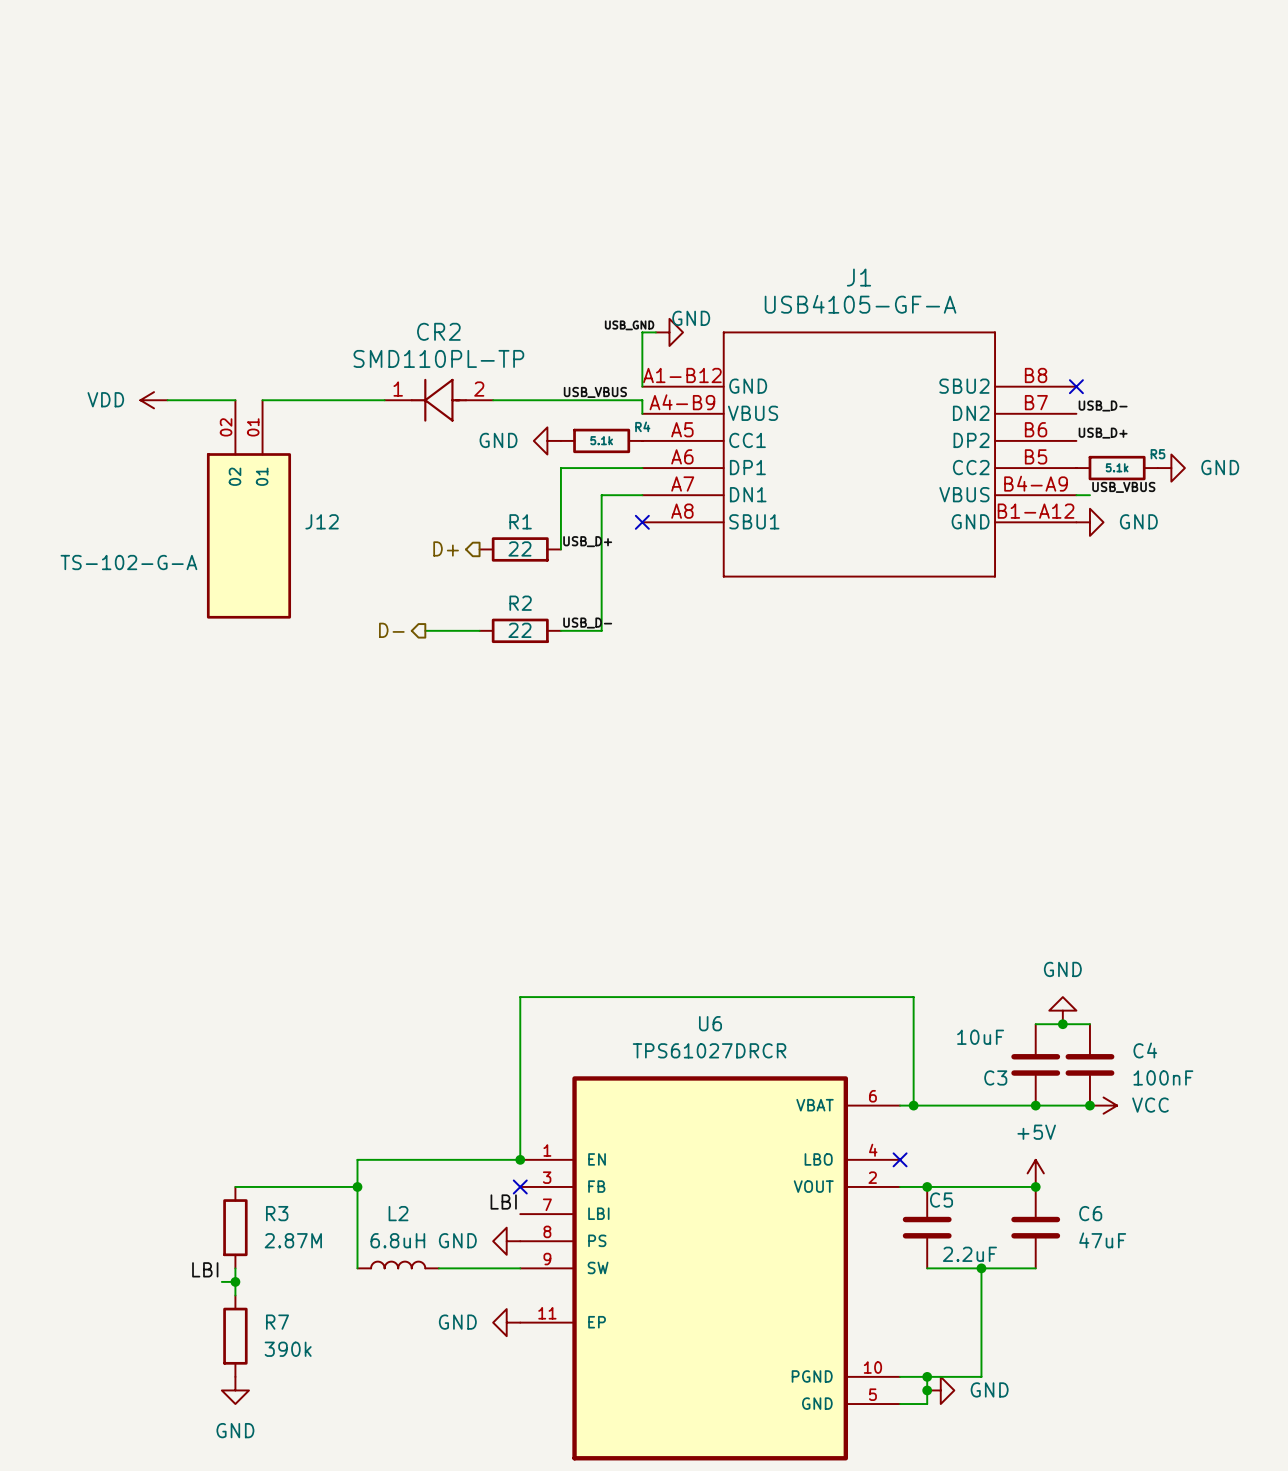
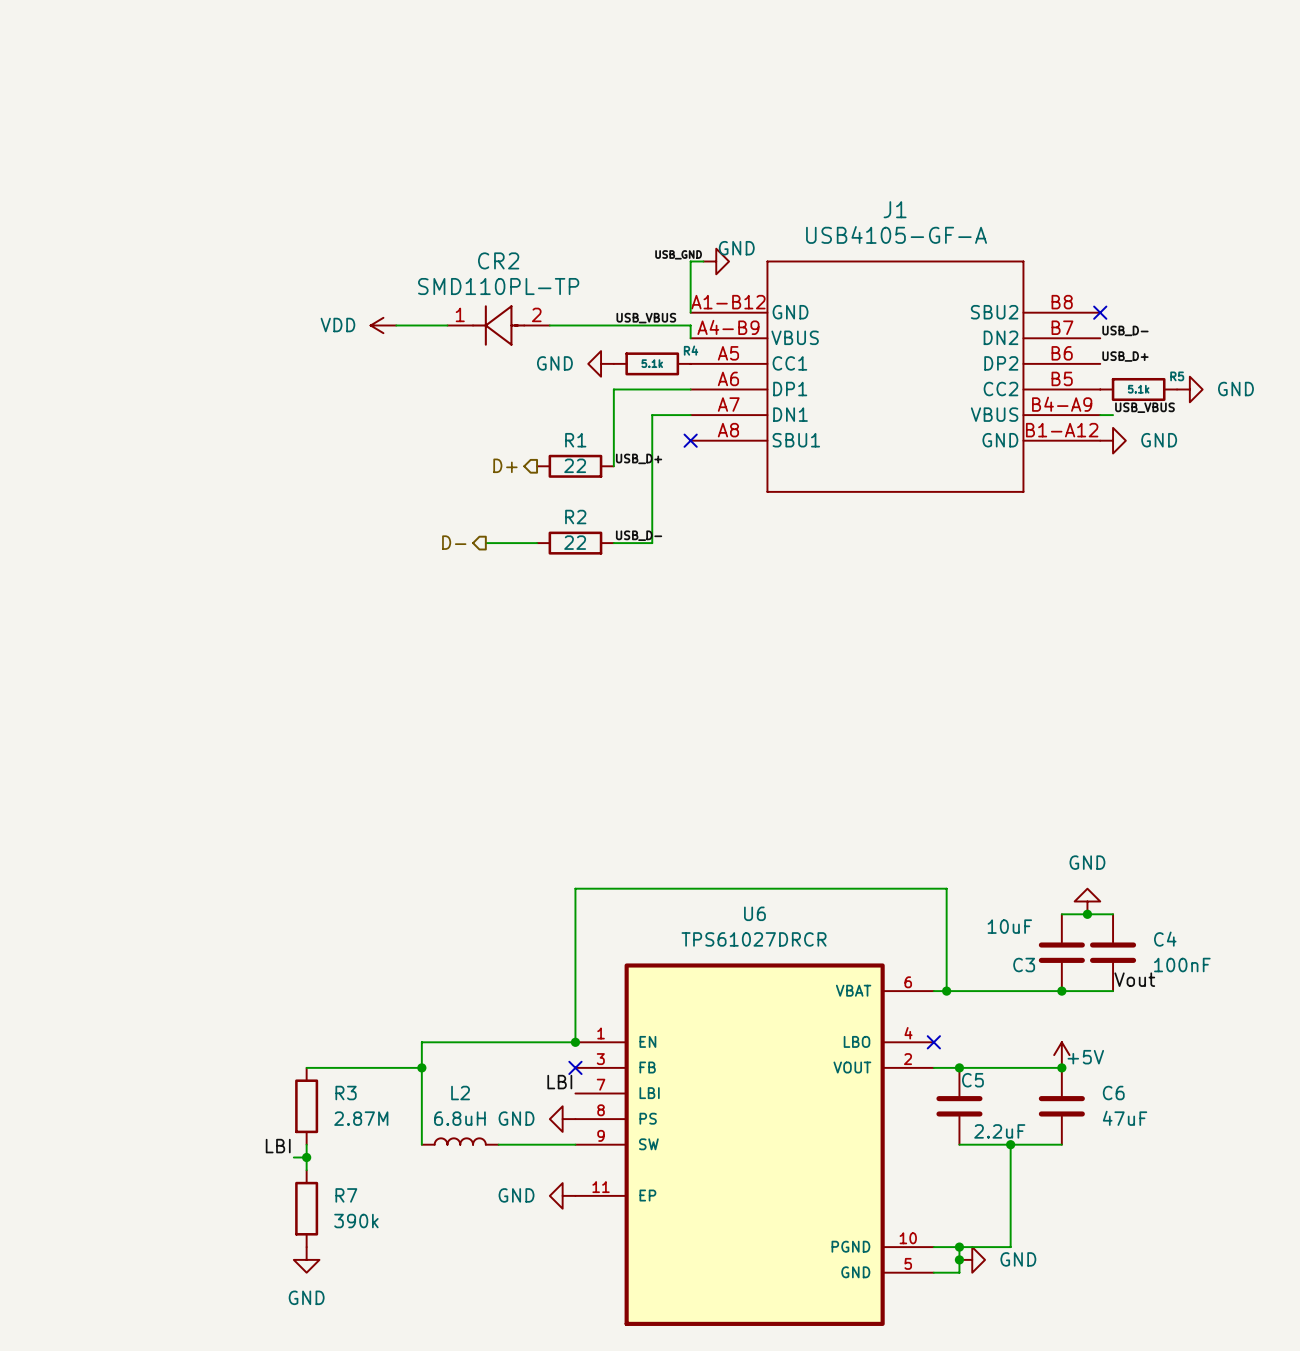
power symbol position: VDD (154, 400) -> VDD (383, 325)
wire: (167, 400) (235, 400) -> none
wire: (262, 400) (330, 400) -> none
J12: TS-102-G-A (248, 509) -> none
label: none -> Vout (1134, 979)
junction: (1089, 1105) -> none
power symbol: VCC (1103, 1105) -> none
power symbol text position: +5V (1036, 1132) -> +5V (1085, 1057)

